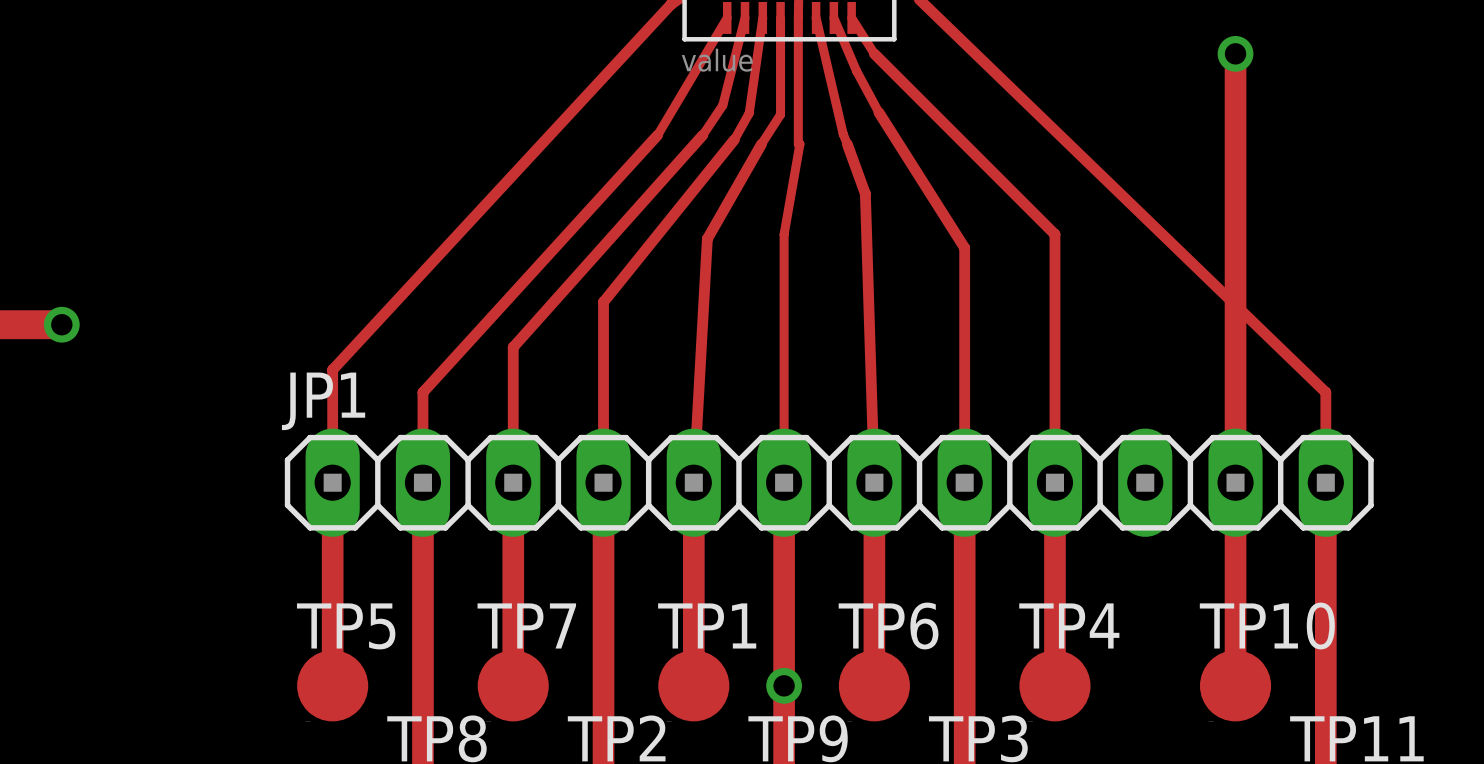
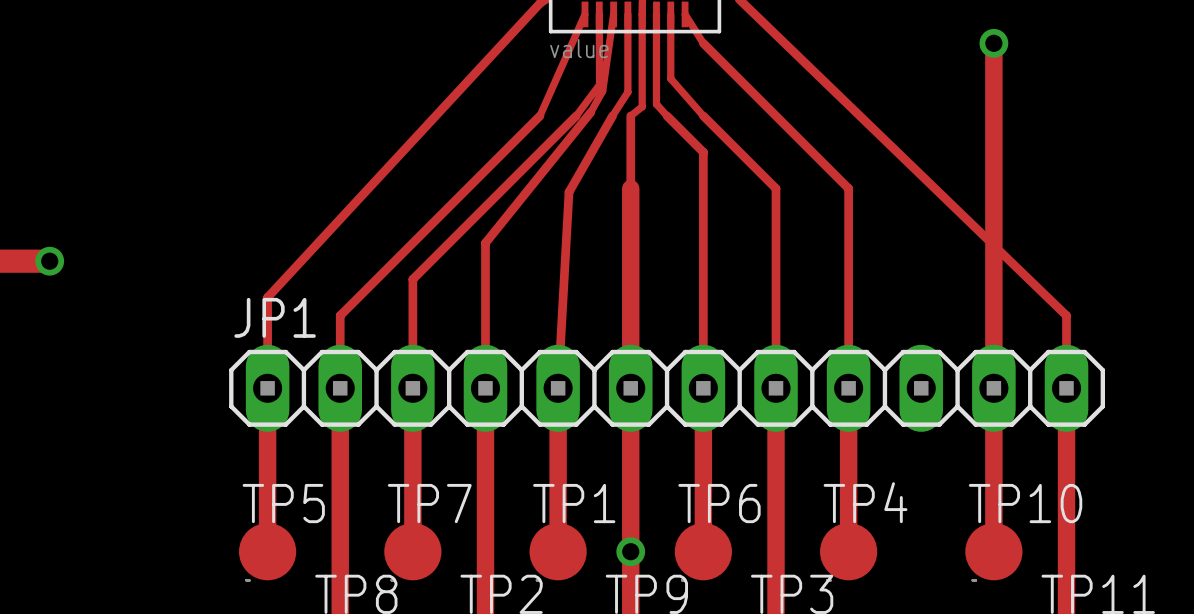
track: (727, 17) (657, 135) (422, 392) -> (585, 14) (539, 115) (340, 315)
track: (745, 17) (722, 105) (702, 135) (513, 347) -> (599, 14) (599, 84) (576, 115) (412, 279)
track: (816, 17) (843, 134) (865, 193) (874, 482) -> (656, 14) (656, 104) (703, 152) (703, 388)
track: (833, 17) (856, 70) (878, 112) (964, 247) -> (670, 14) (670, 78) (703, 115) (776, 188) (776, 199)
track: (798, 132) (798, 144) (799, 144) (784, 234) -> (642, 106) (630, 115) (630, 188)
track width: thin (784, 234) (784, 482) -> thick (630, 188) (630, 388)

